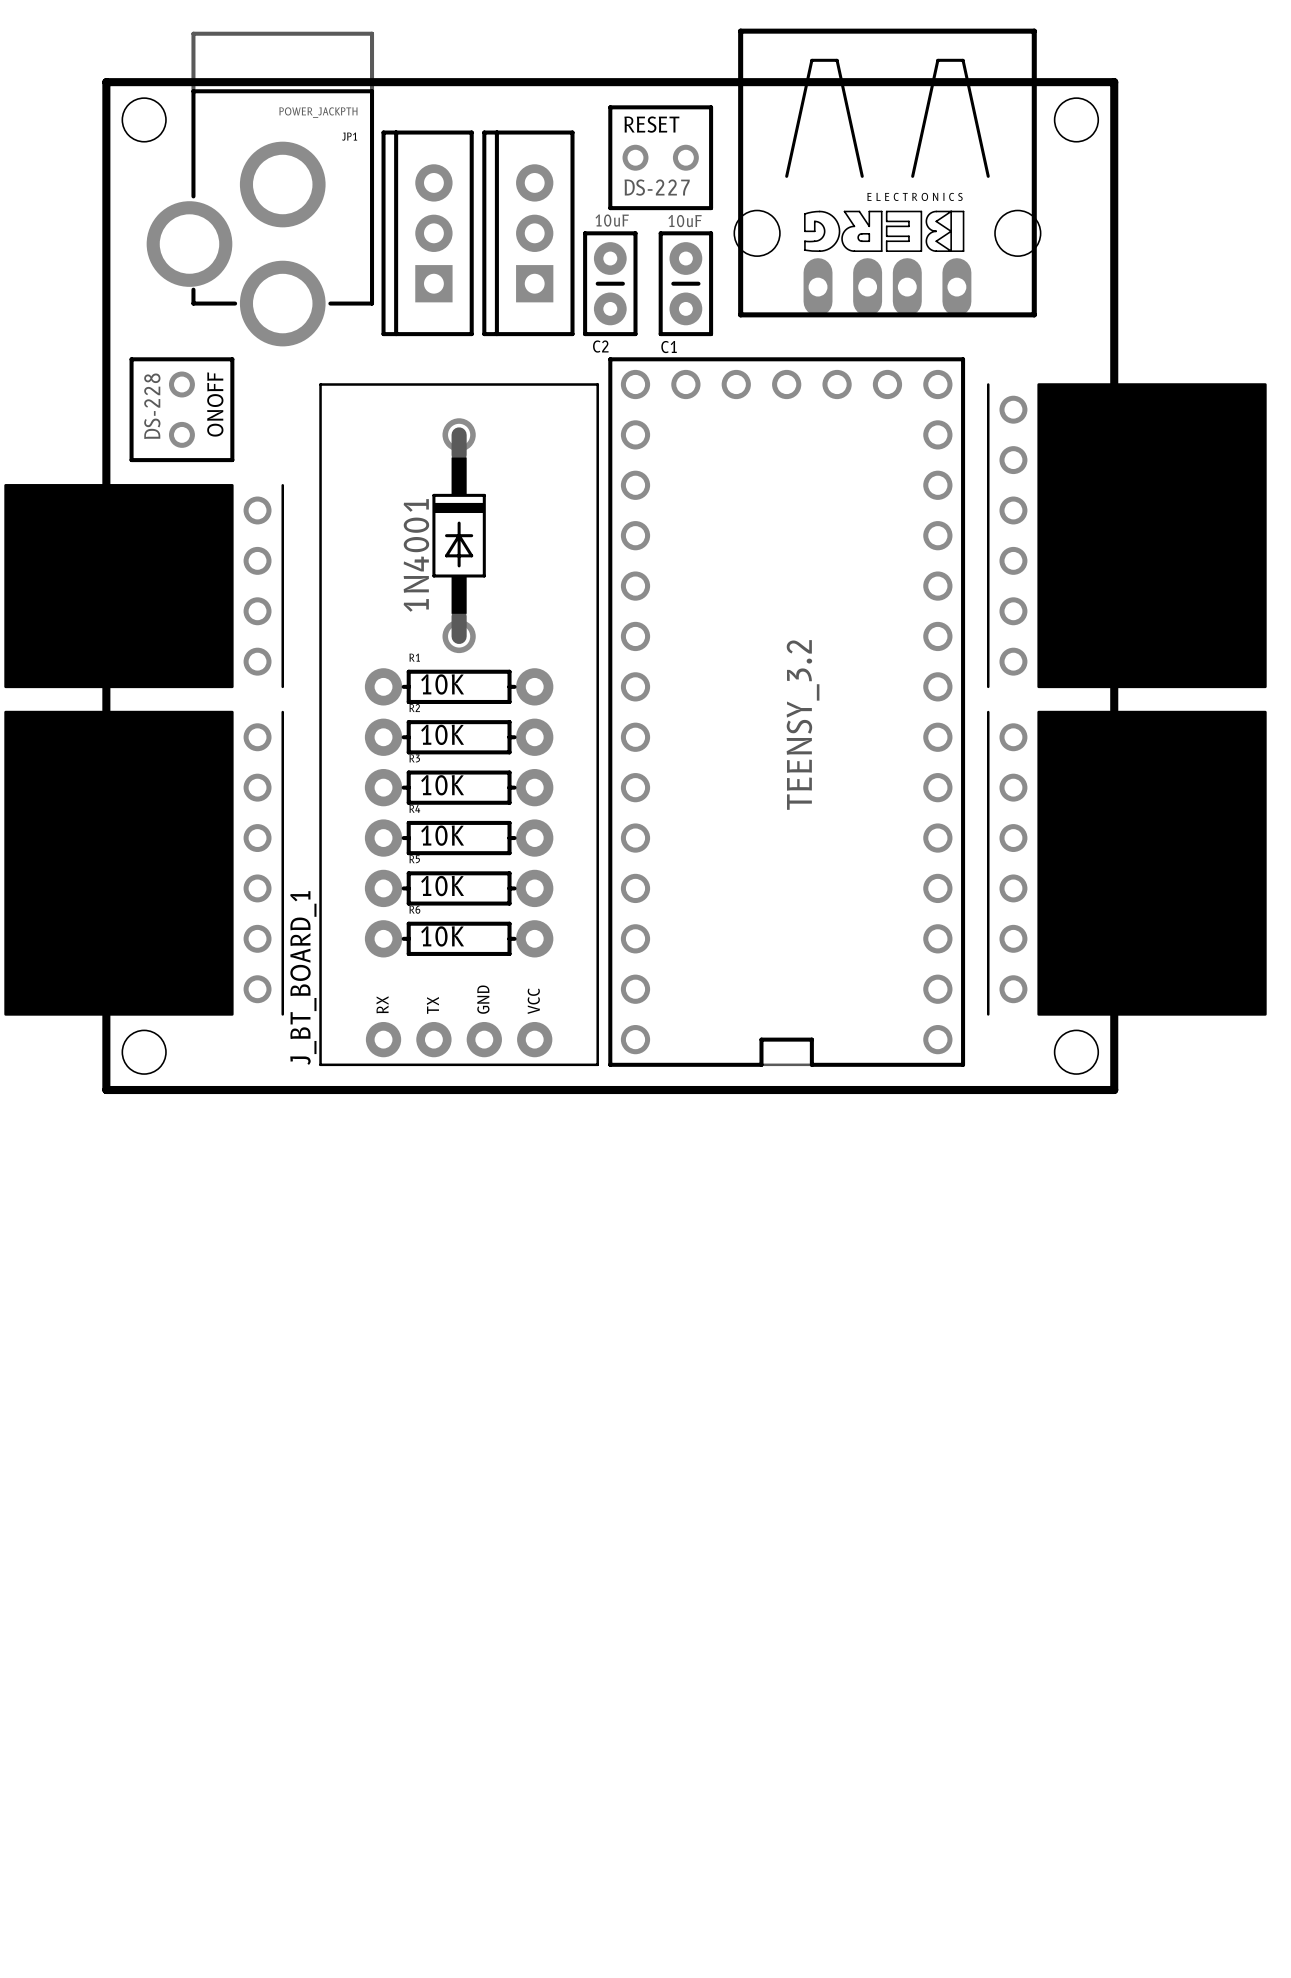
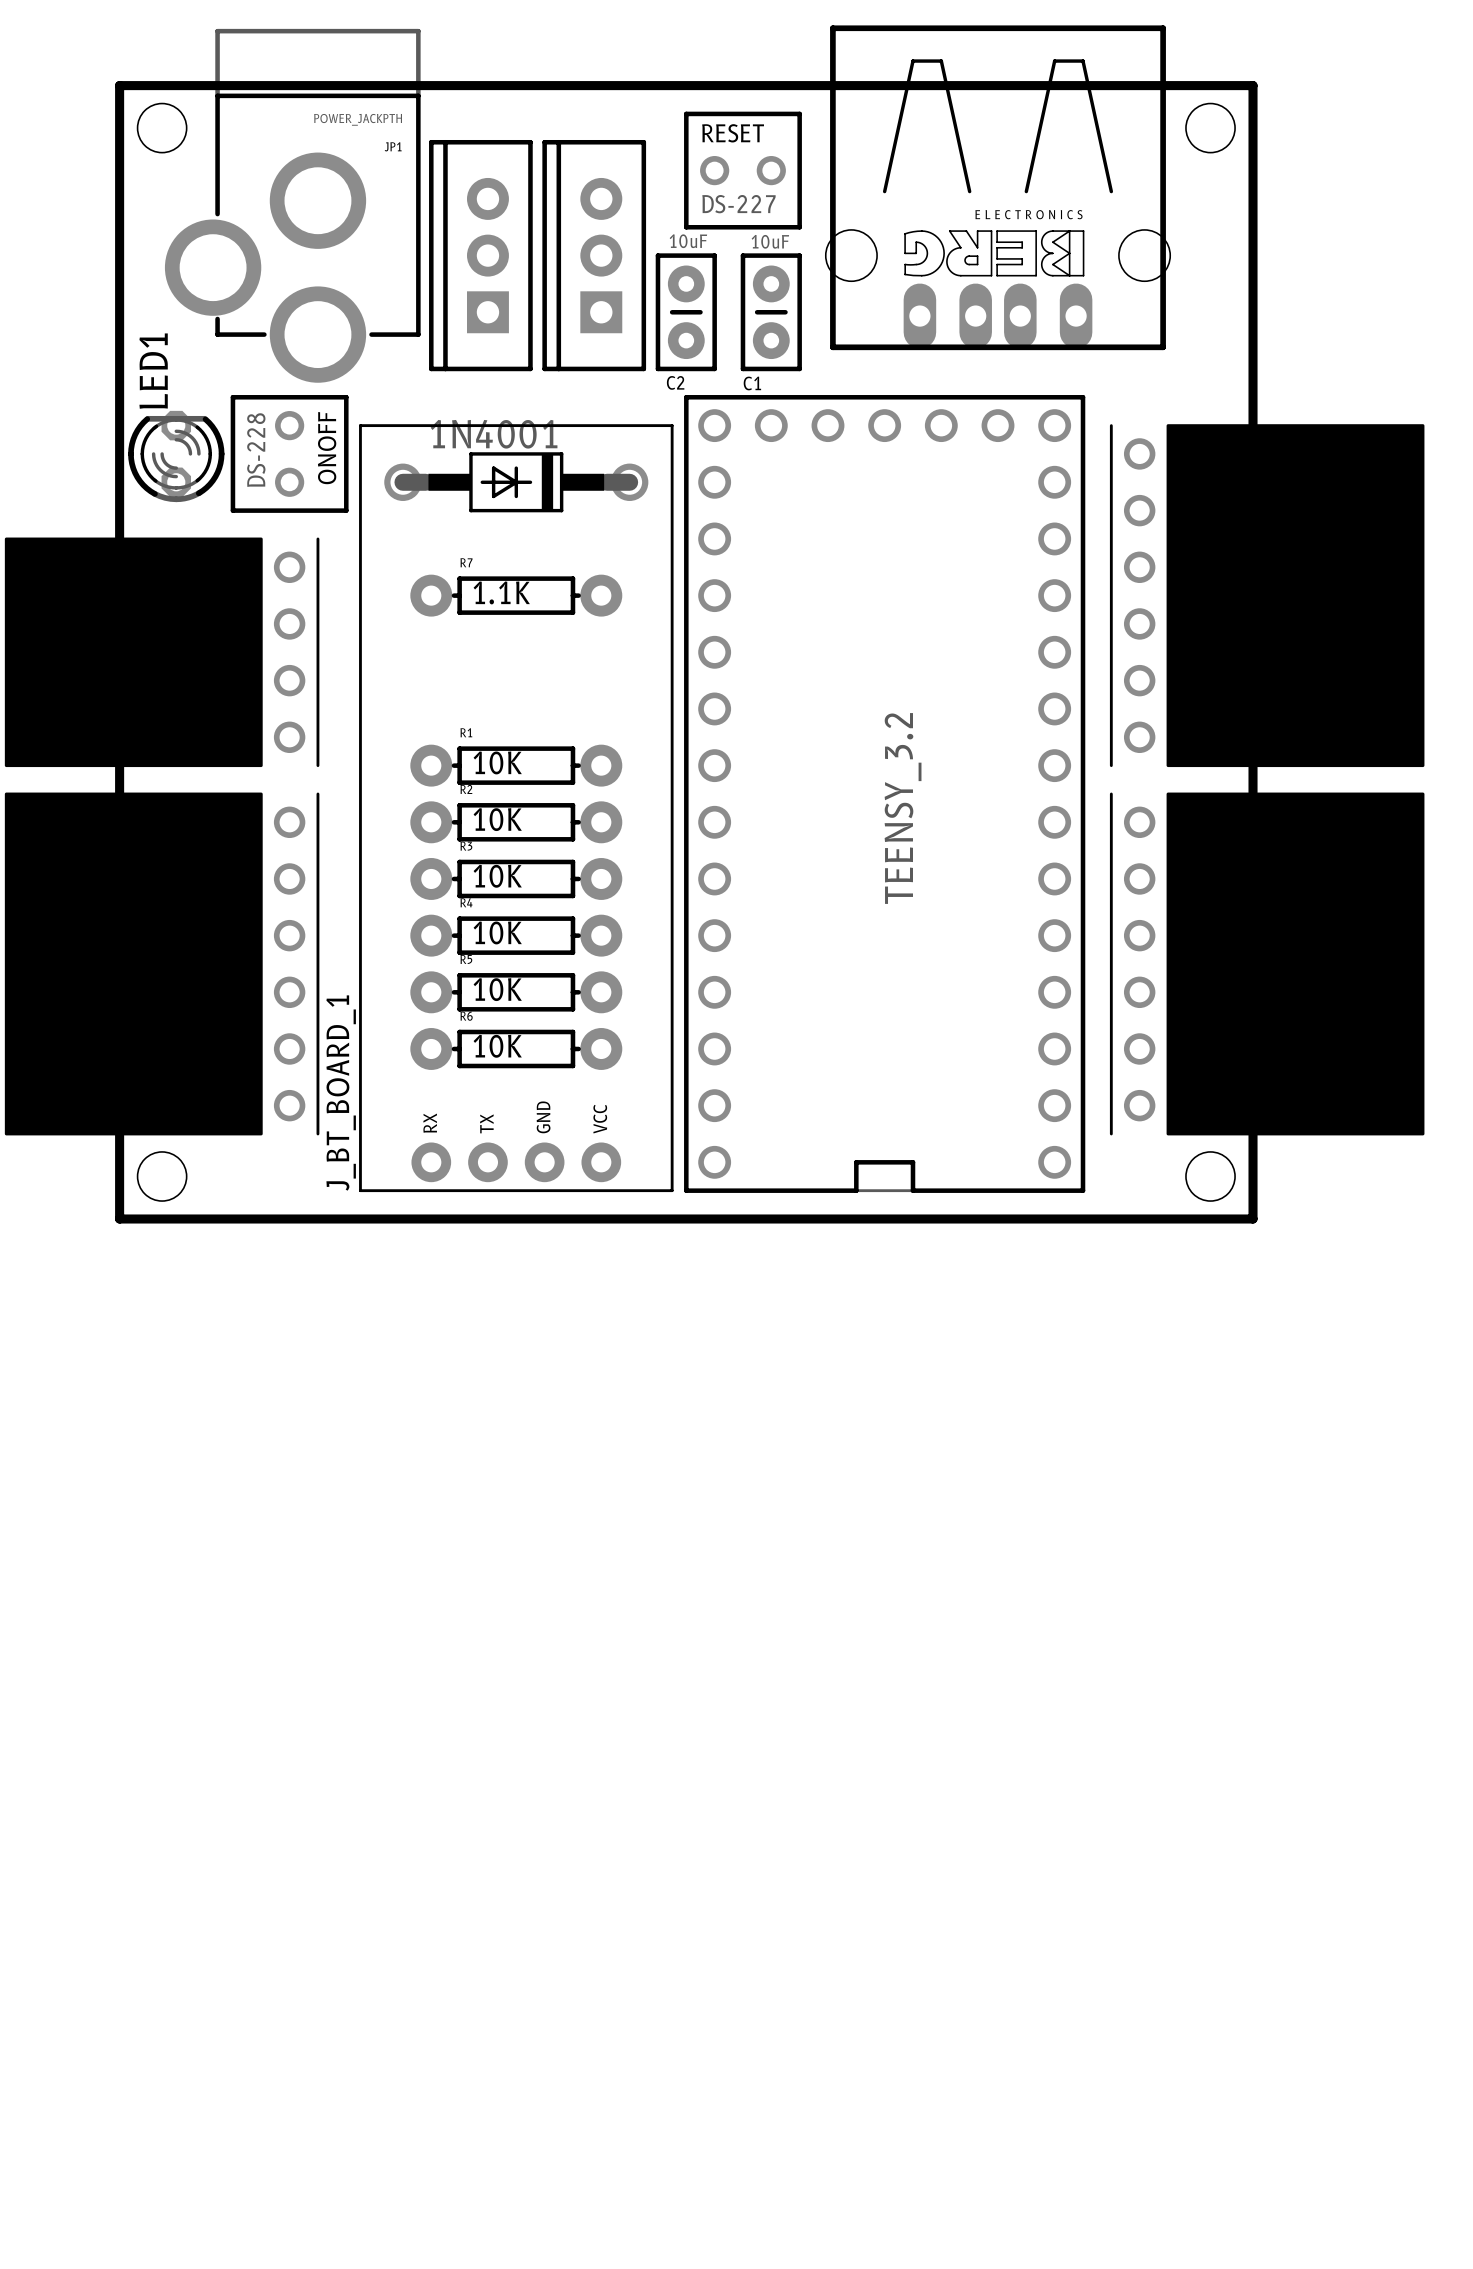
ONOFF position: (181, 409) -> (289, 453)
LED1: none -> (176, 456)
part rotation: 0° (459, 535) -> 90° clockwise (516, 482)
R7: none -> 1.1K (516, 595)

